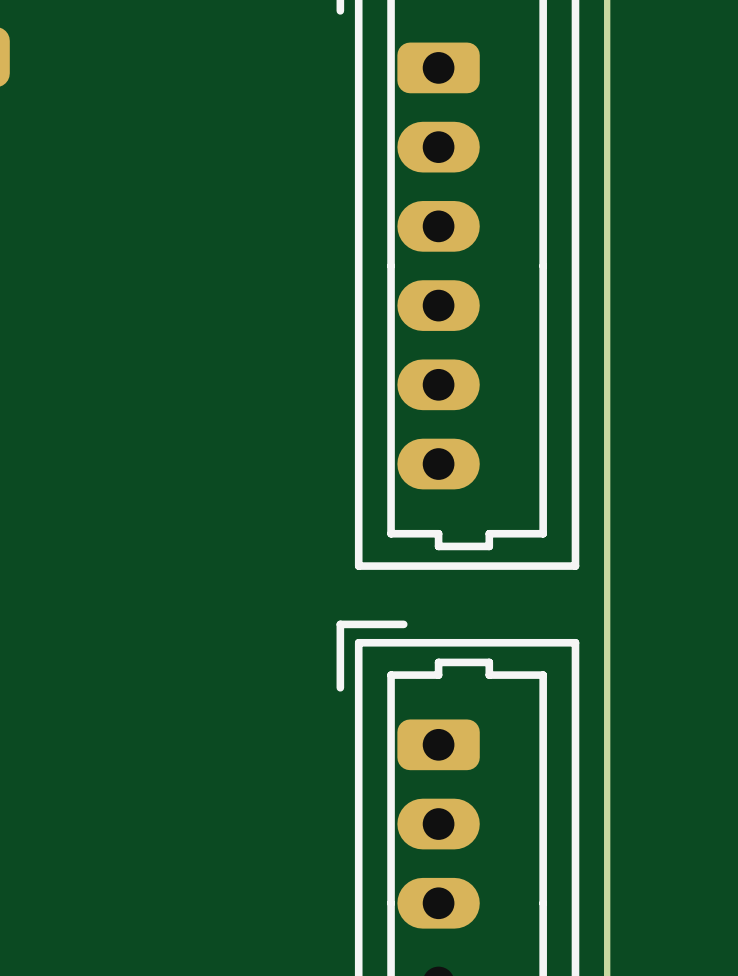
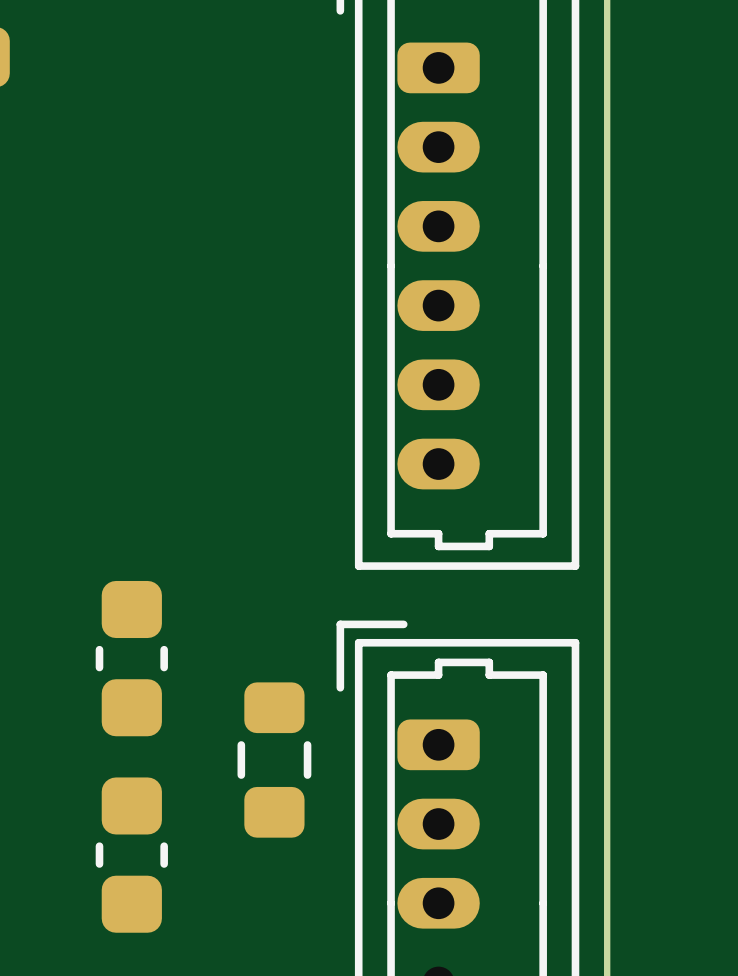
part: none -> (131, 658)
part: none -> (274, 760)
part: none -> (131, 855)

